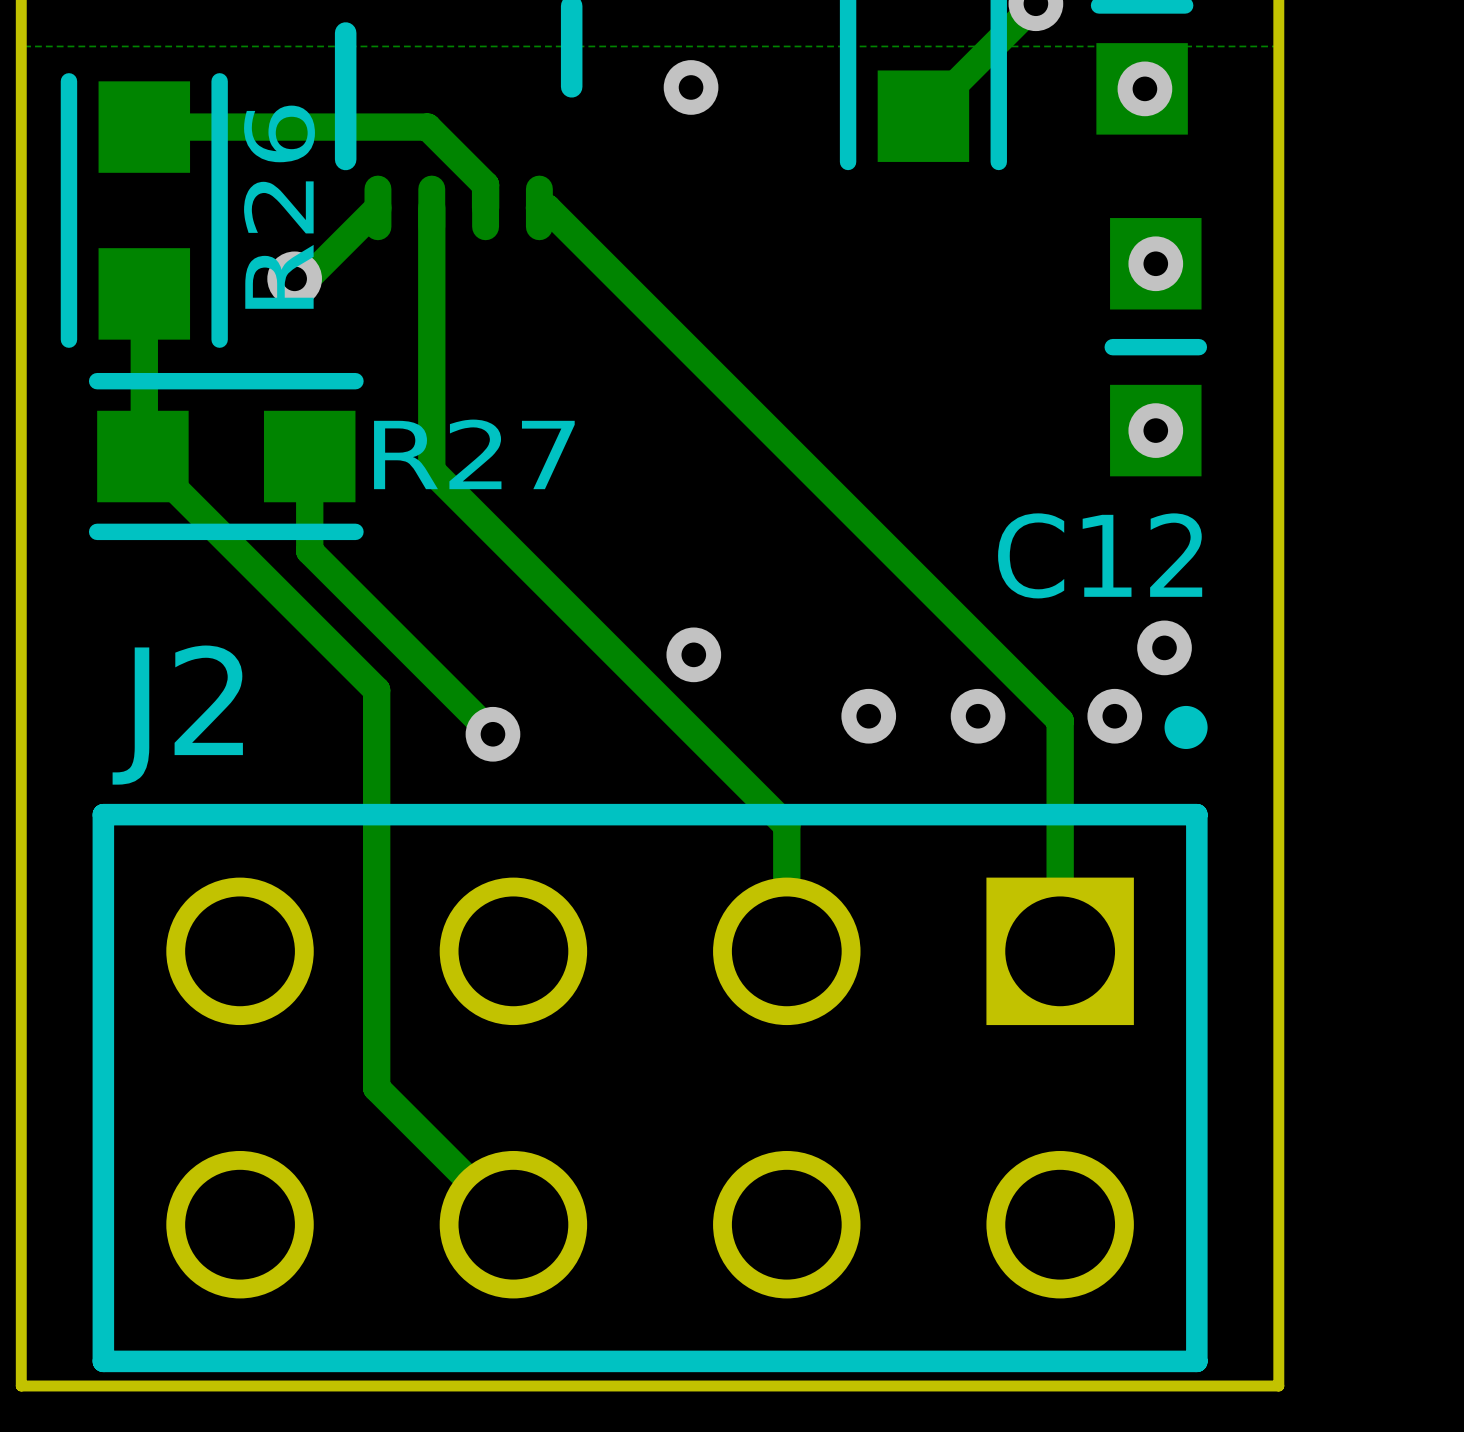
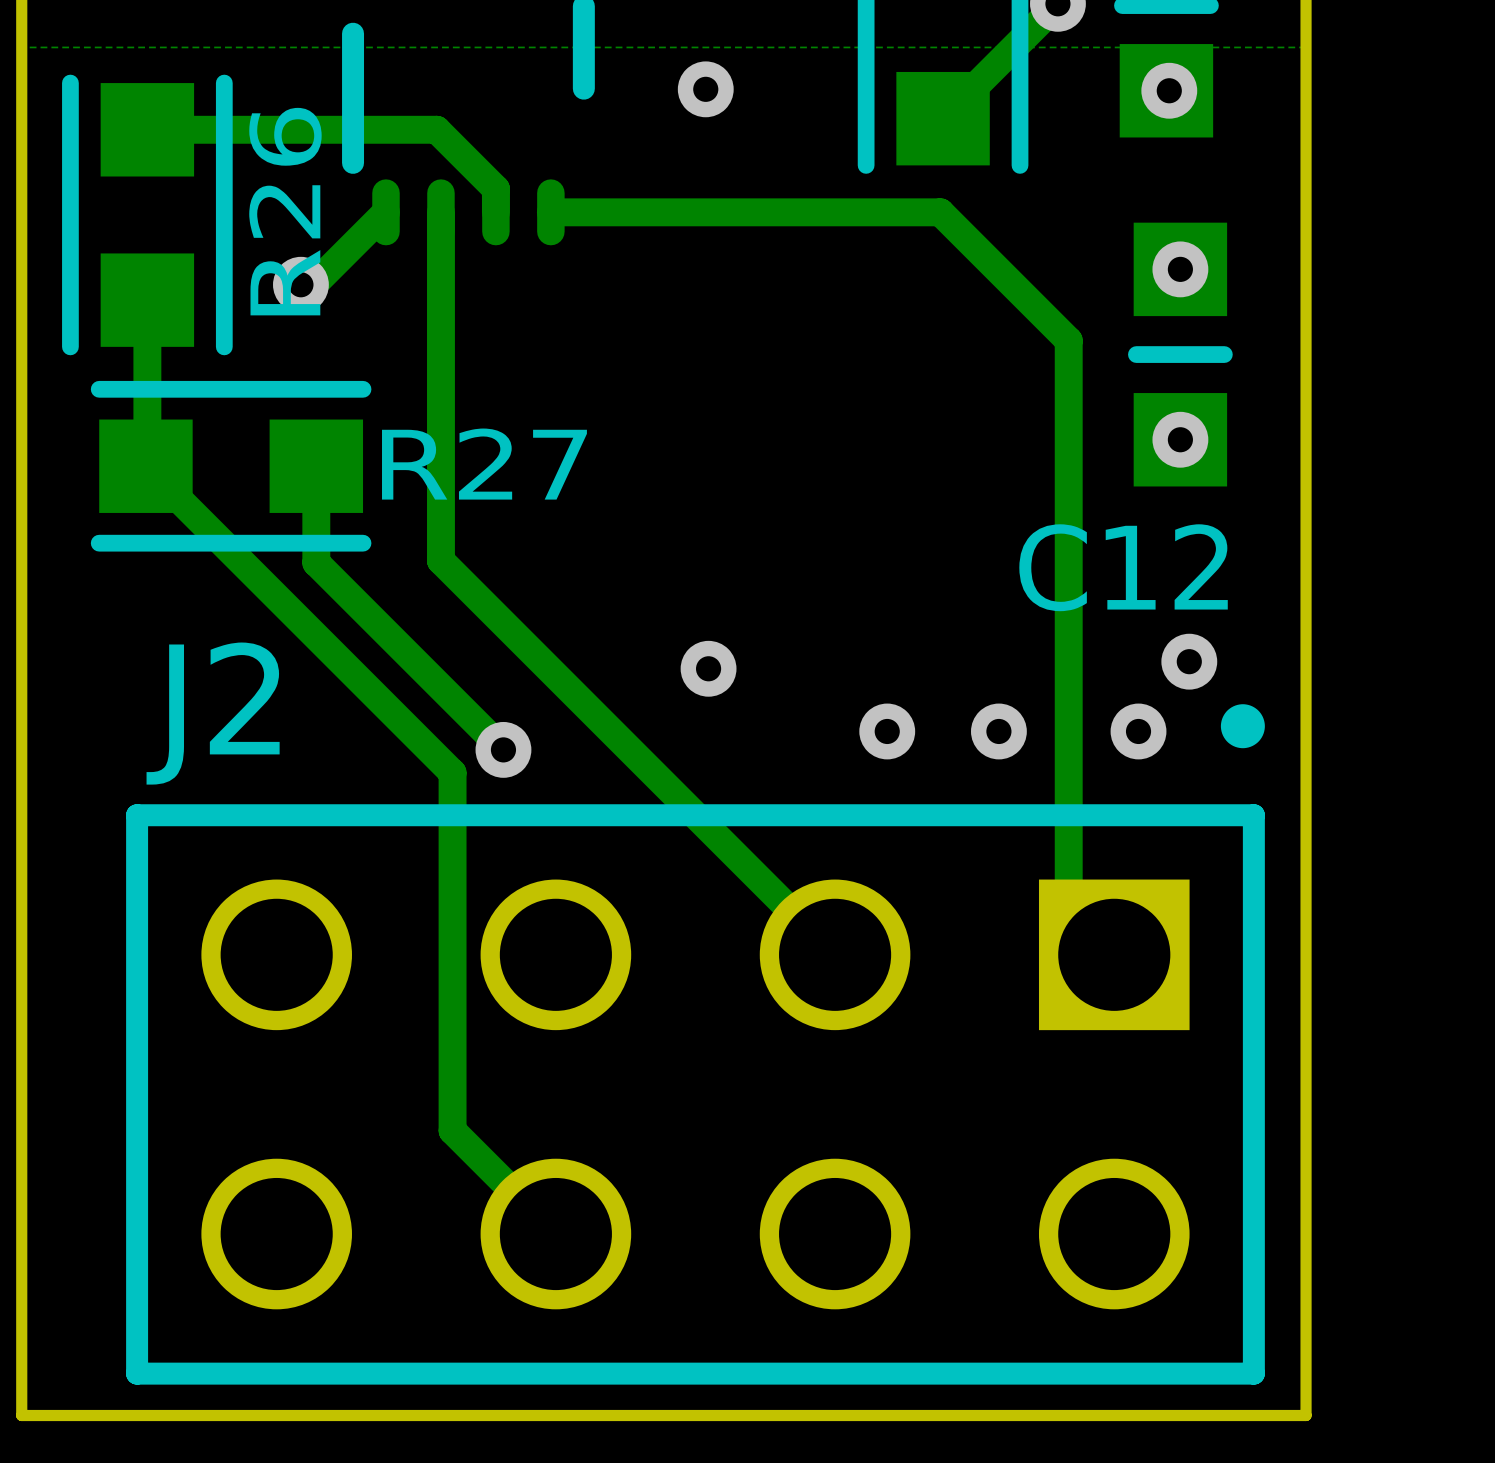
track: (547, 207) (1060, 720) (1060, 951) -> (558, 212) (940, 212) (1068, 340) (1068, 909) (1114, 954)
track: (431, 470) (786, 825) (786, 951) -> (440, 480) (440, 560) (835, 954)
track: (376, 690) (376, 1087) (513, 1224) -> (384, 704) (452, 772) (452, 1130) (555, 1234)
J2 position: (650, 1039) -> (695, 1044)

